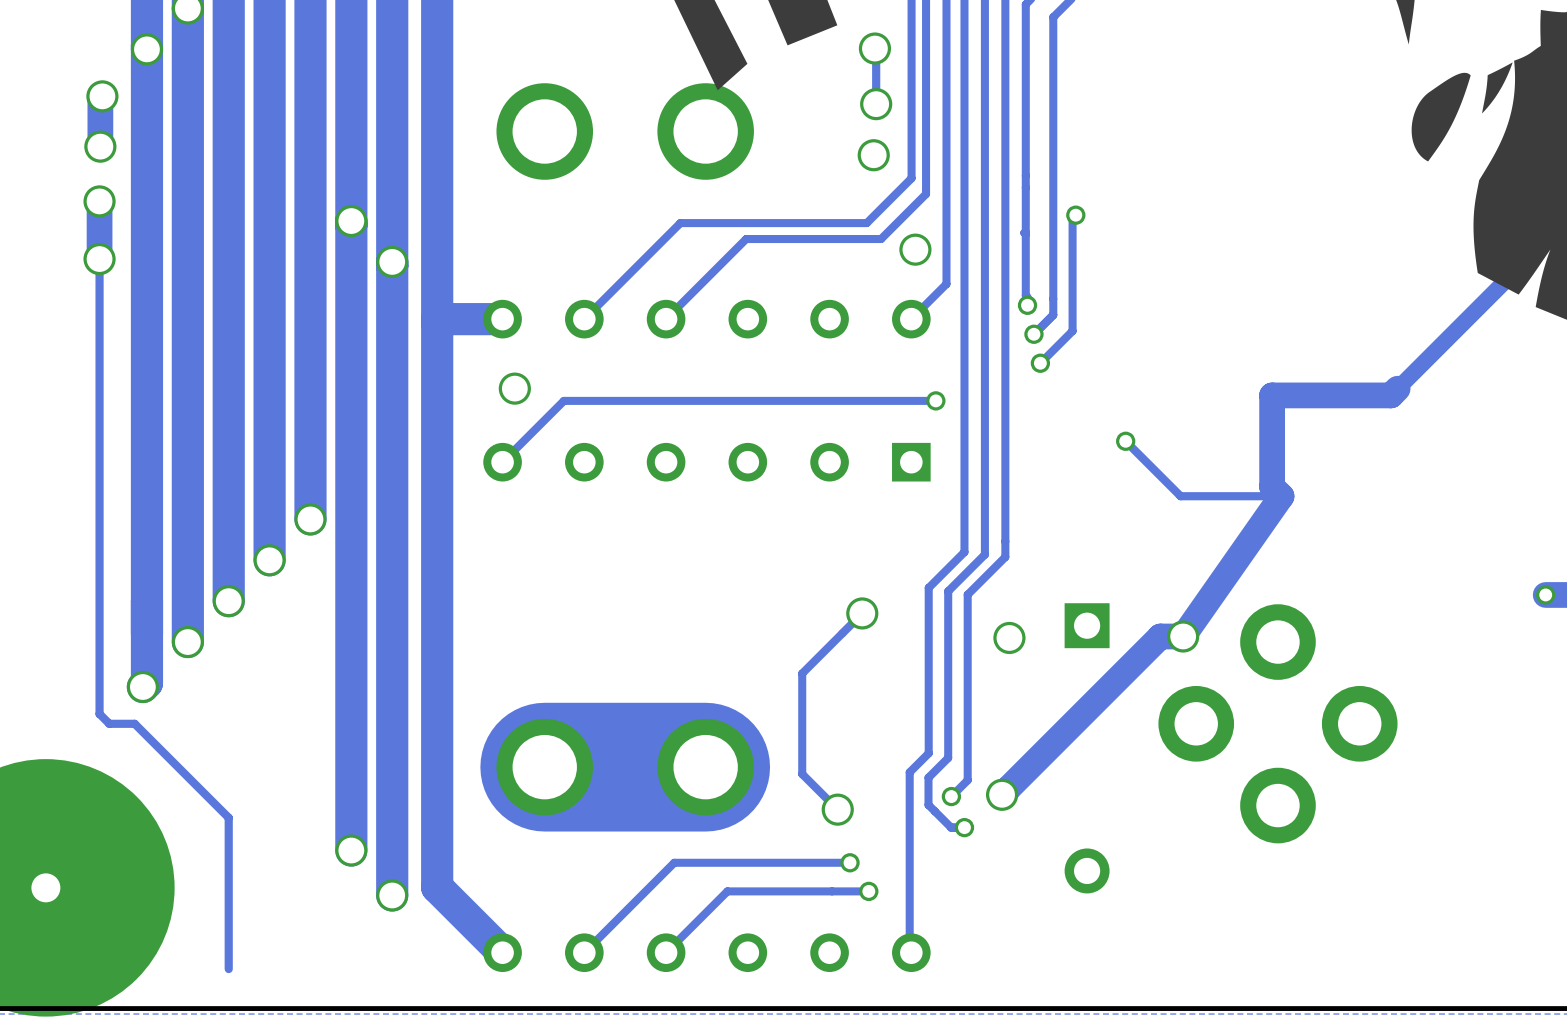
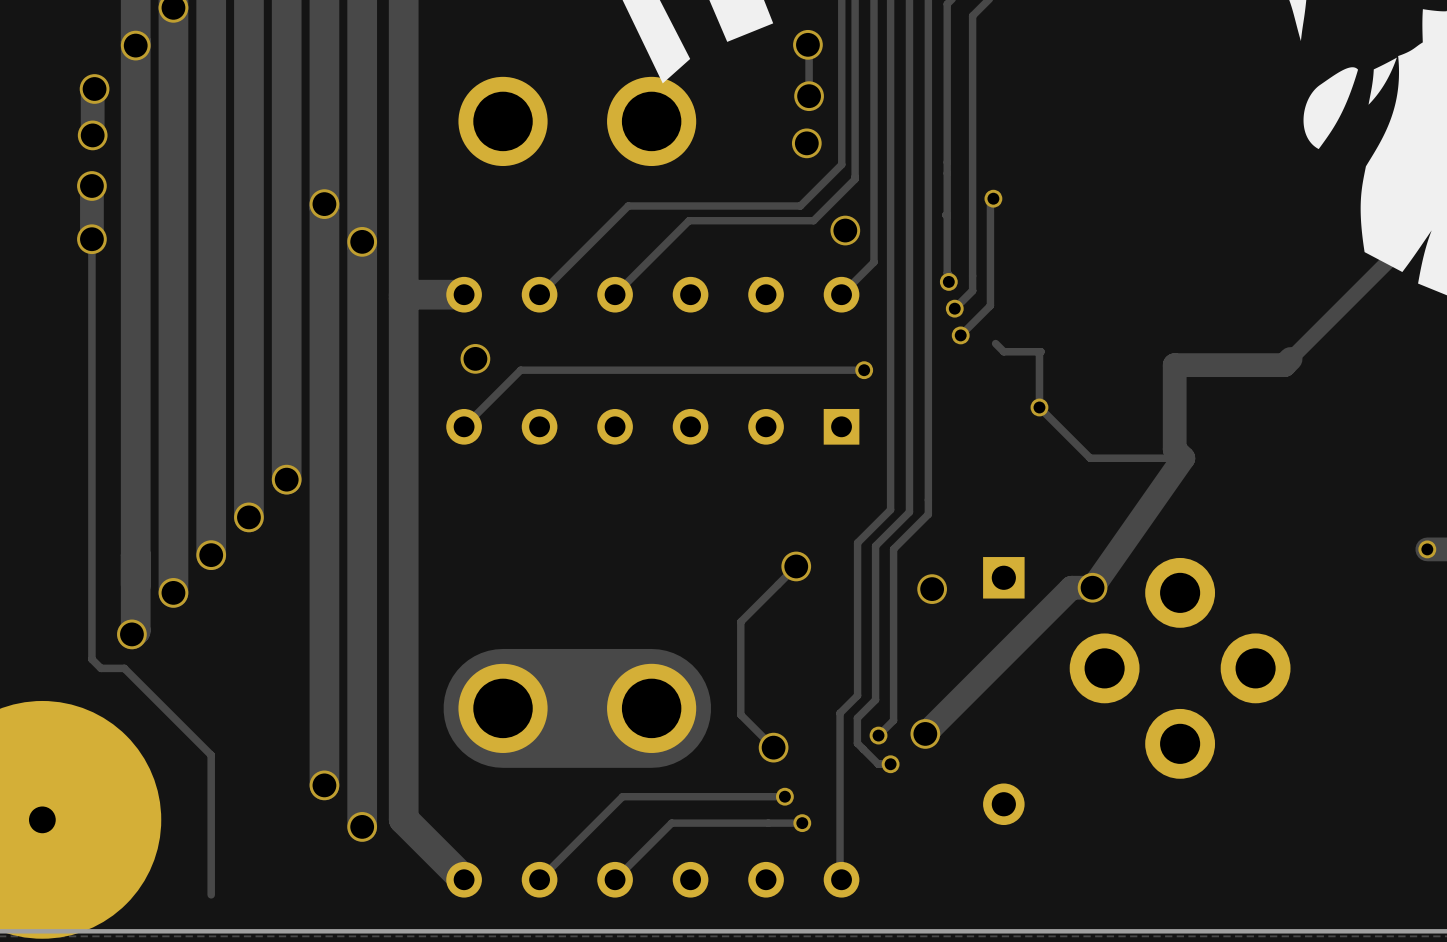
track: none -> (995, 343) (1003, 351) (1040, 351)
track: none -> (1039, 351) (1039, 407)

